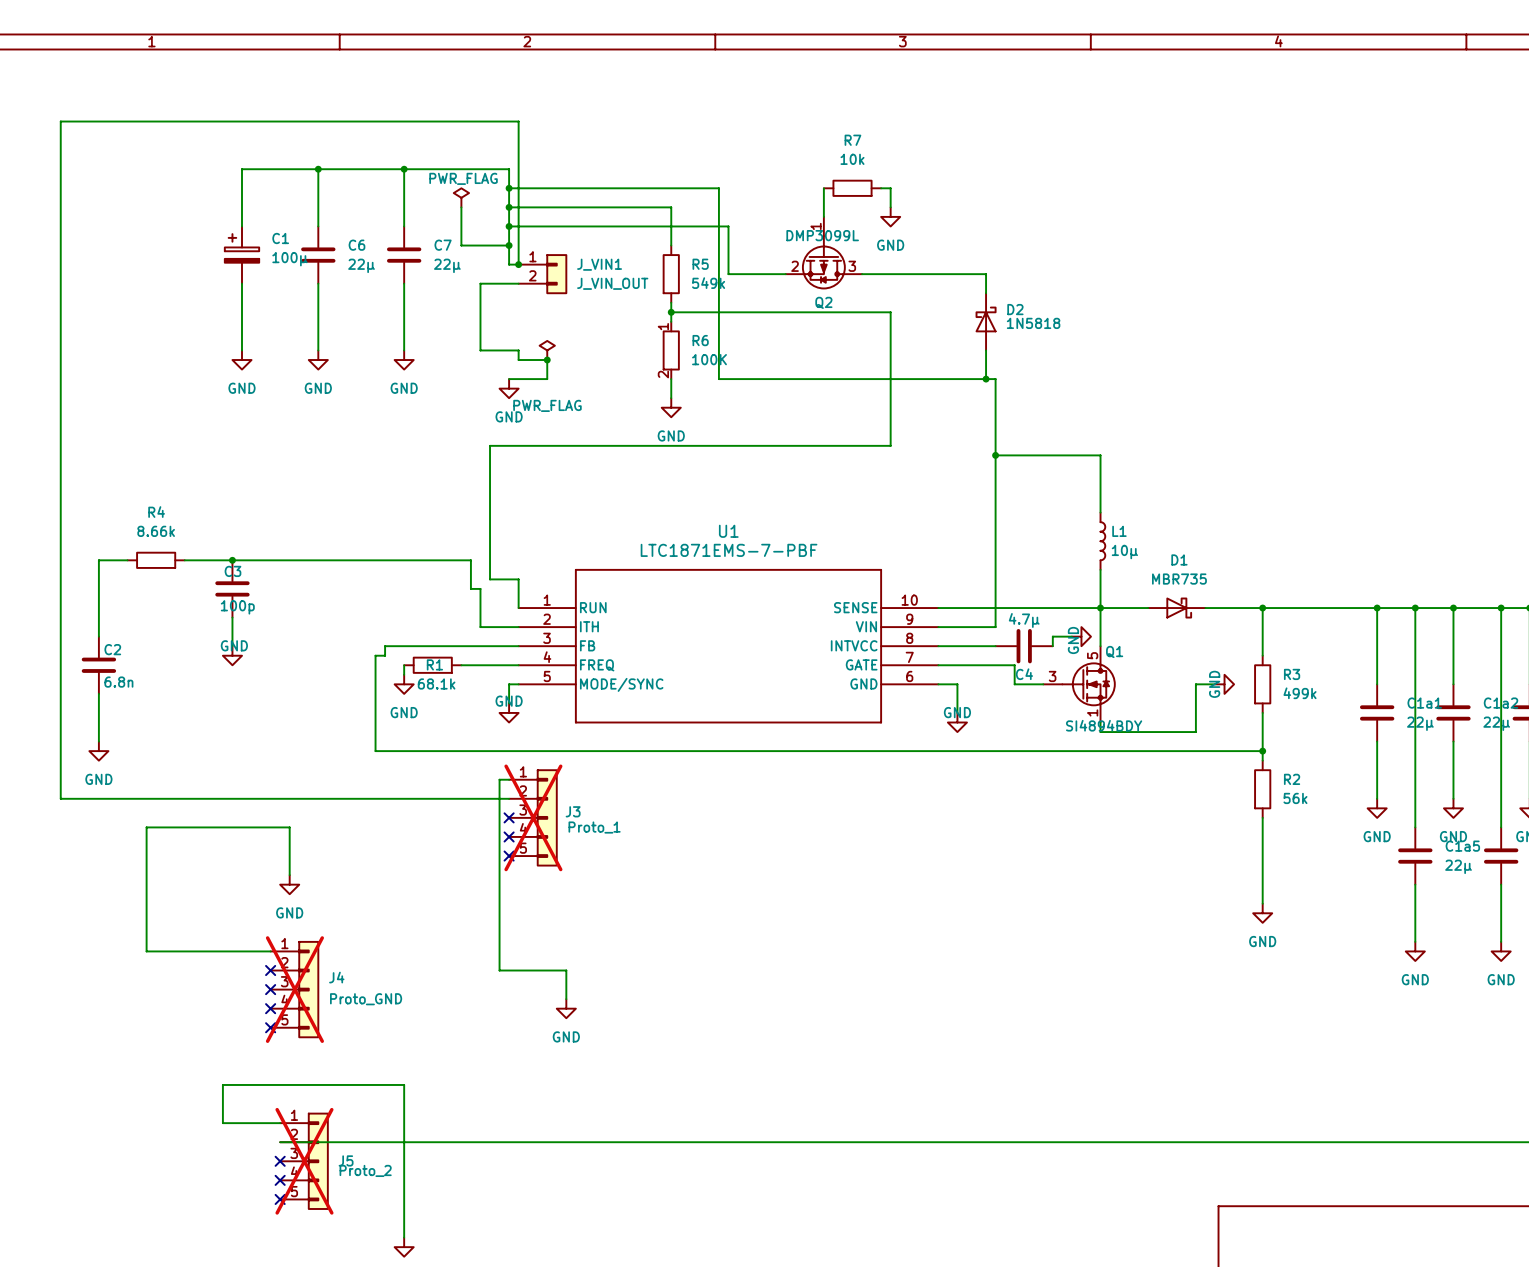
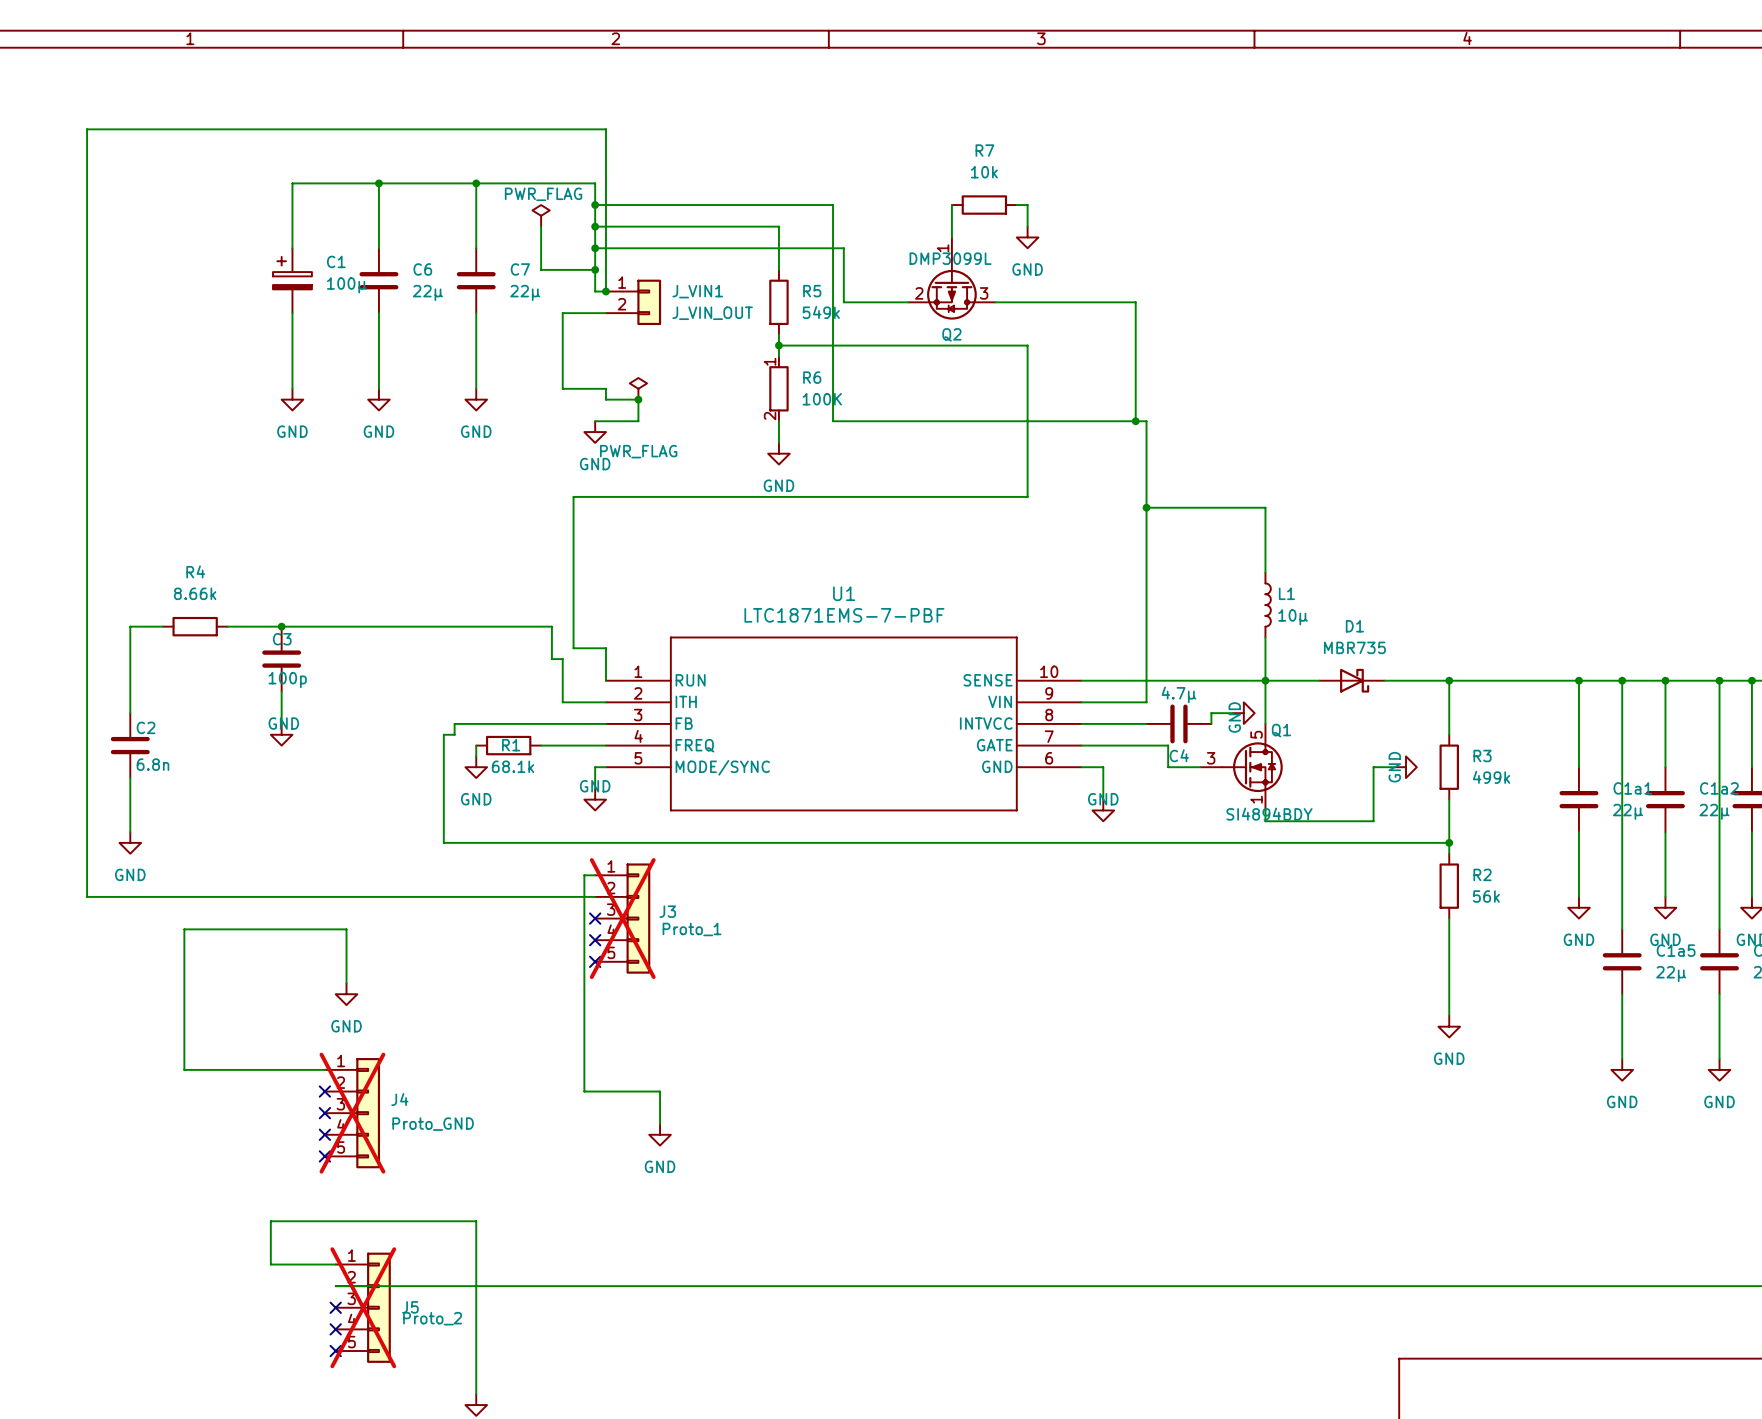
D2: 1N5818 (986, 321) -> none

